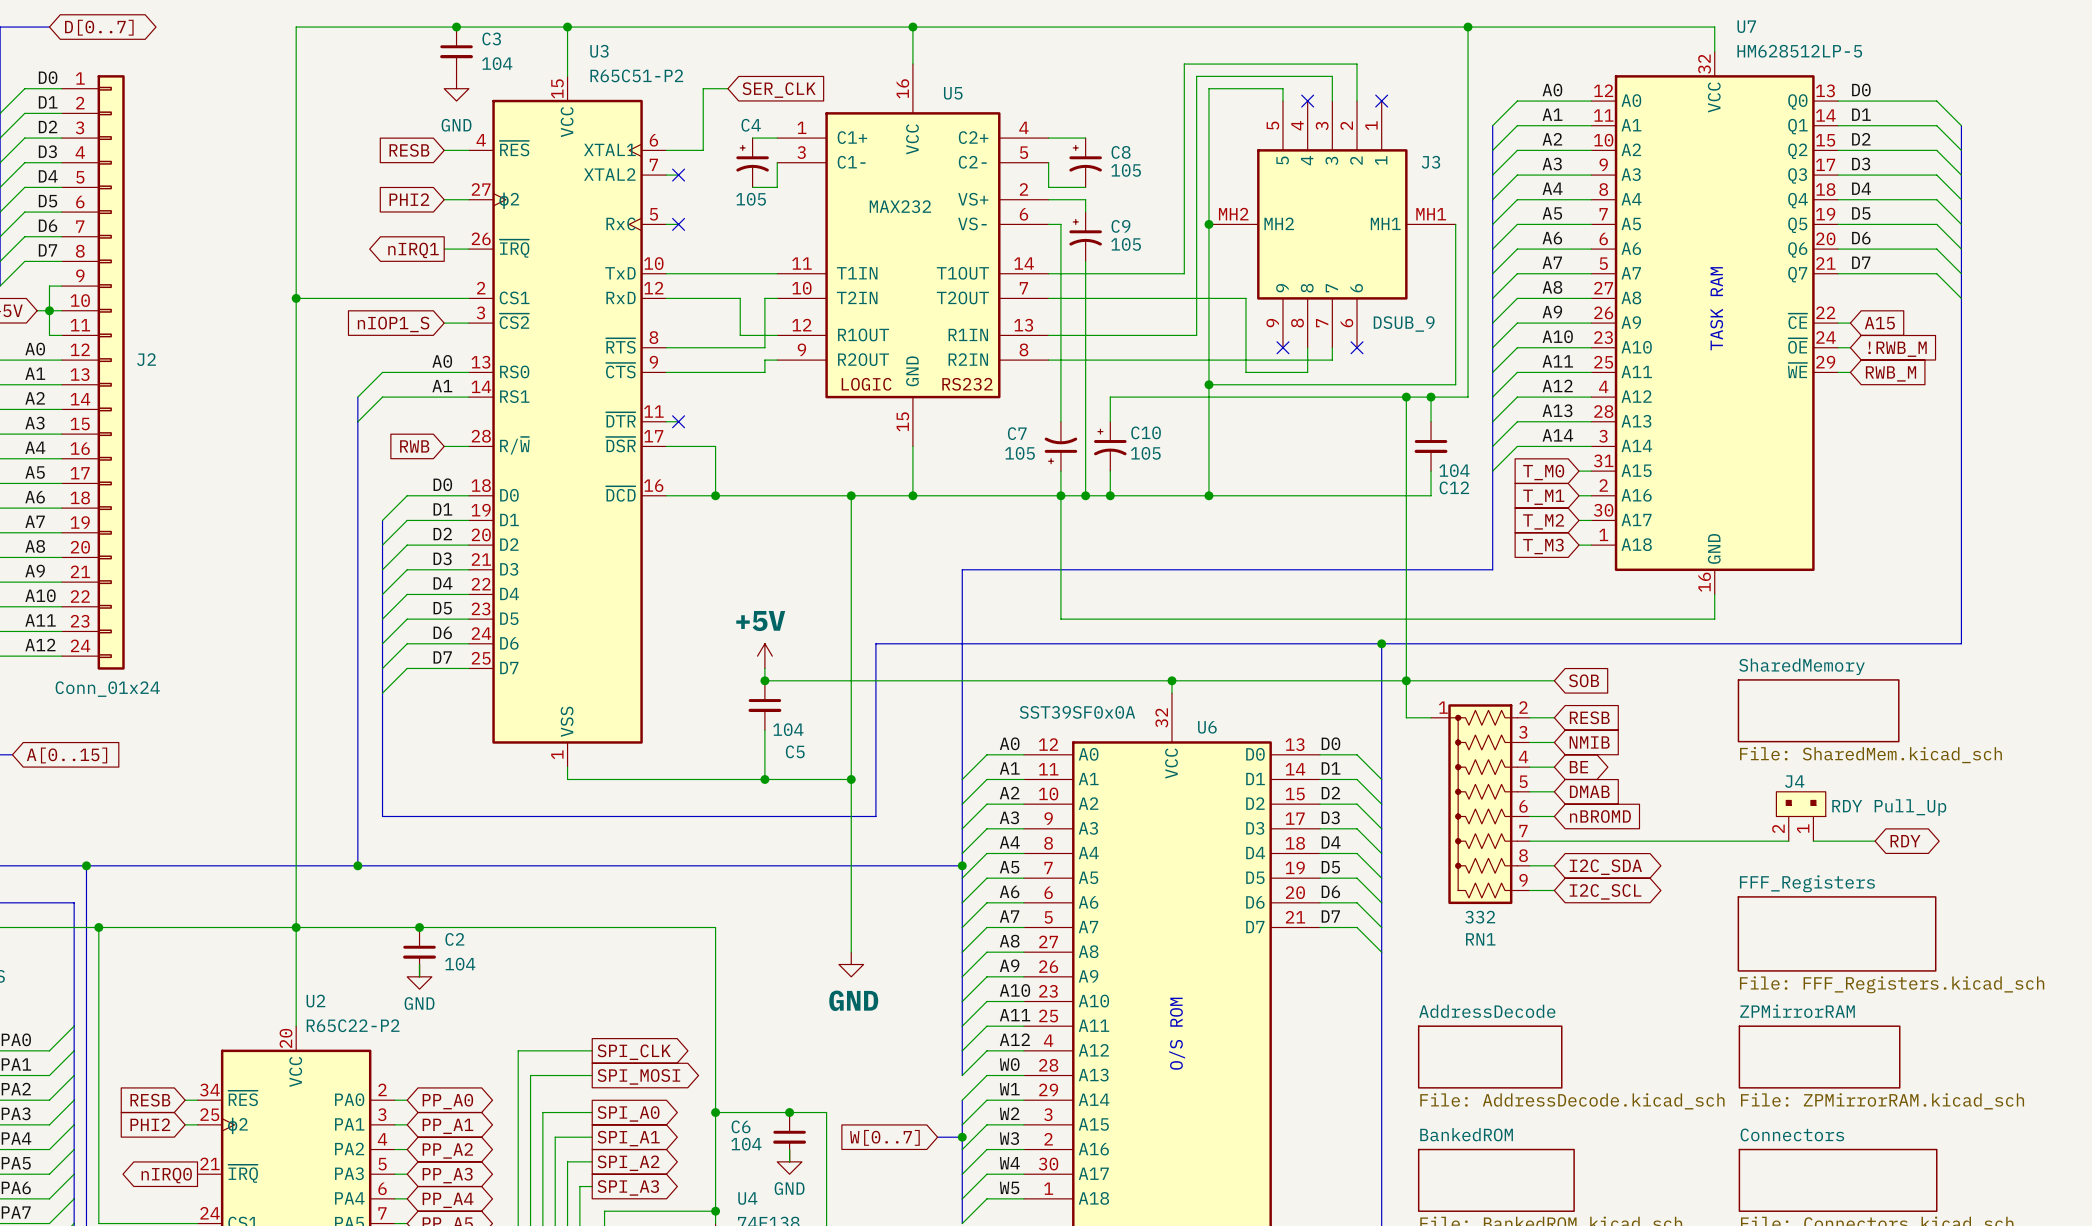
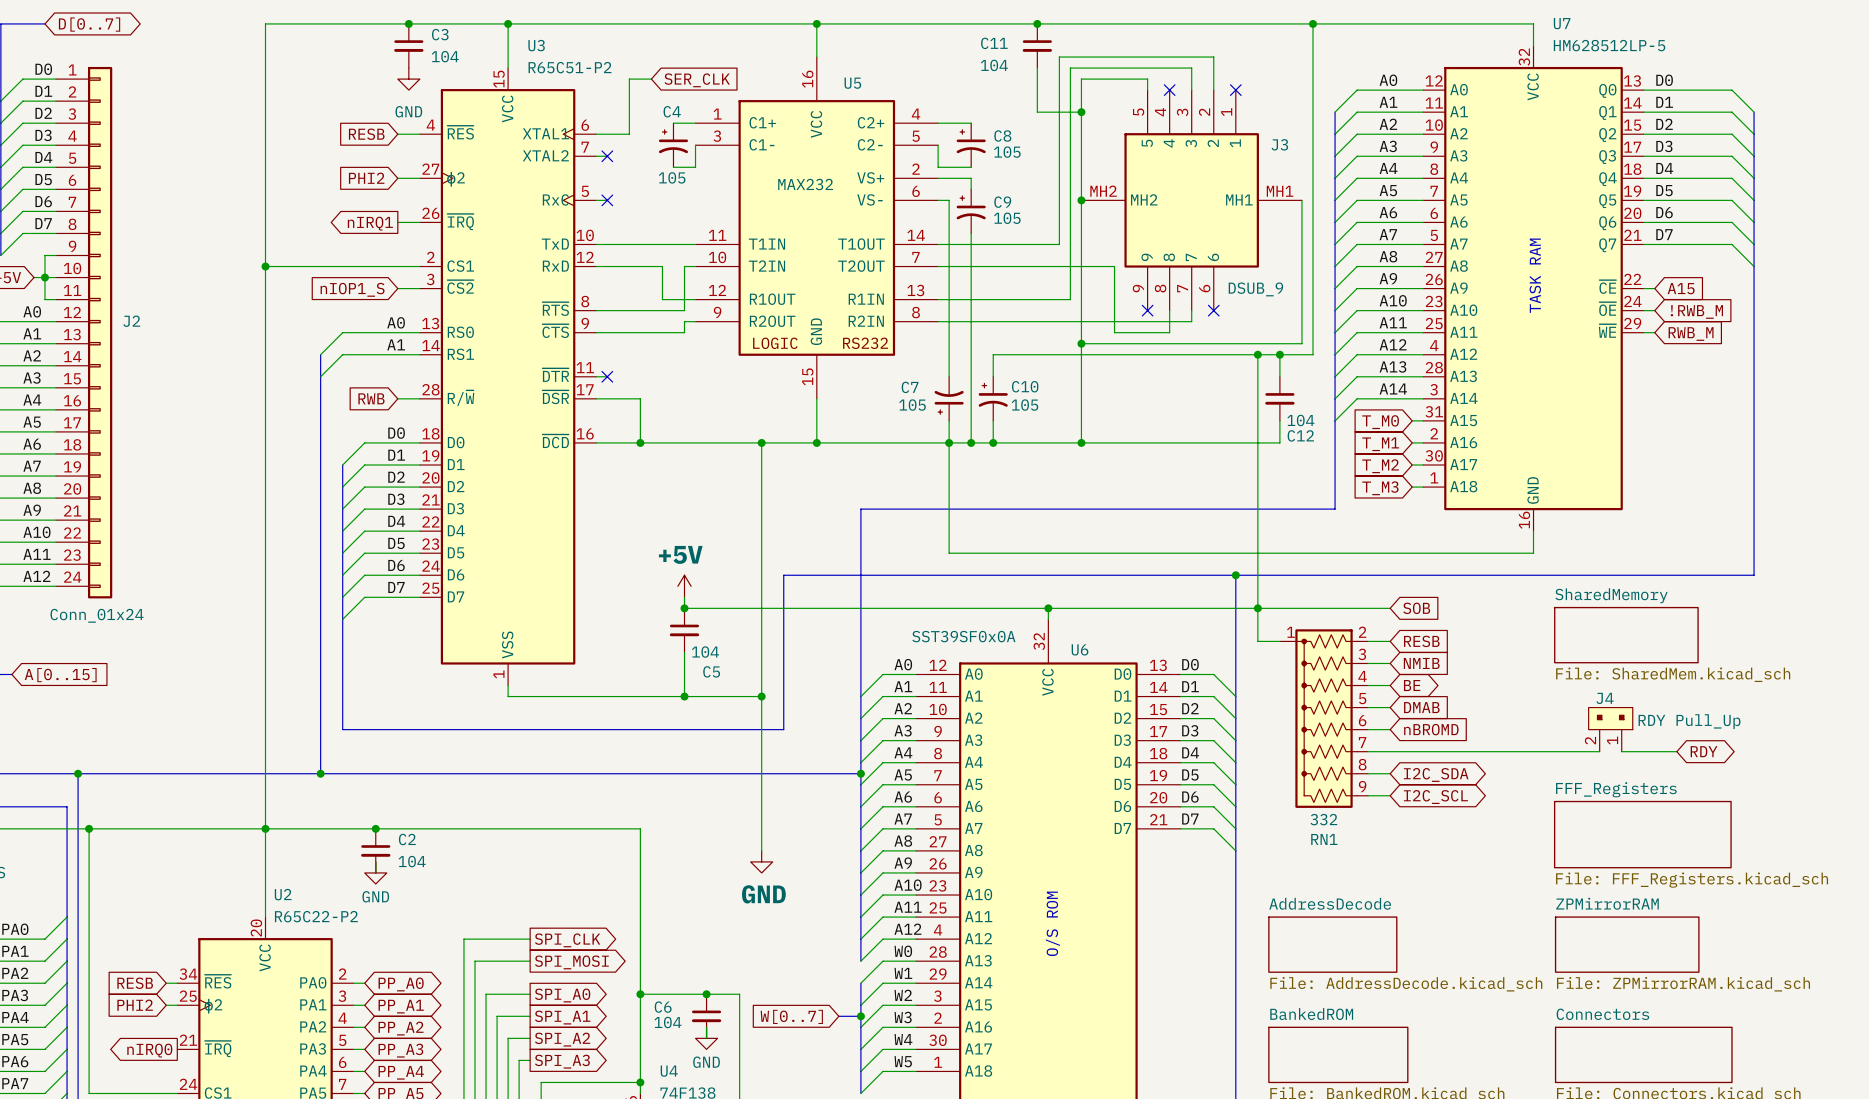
junction: none -> (1037, 23)
C11: none -> 104 (1037, 46)
wire: none -> (1037, 68) (1037, 112) (1081, 112)
junction: none -> (1081, 112)

